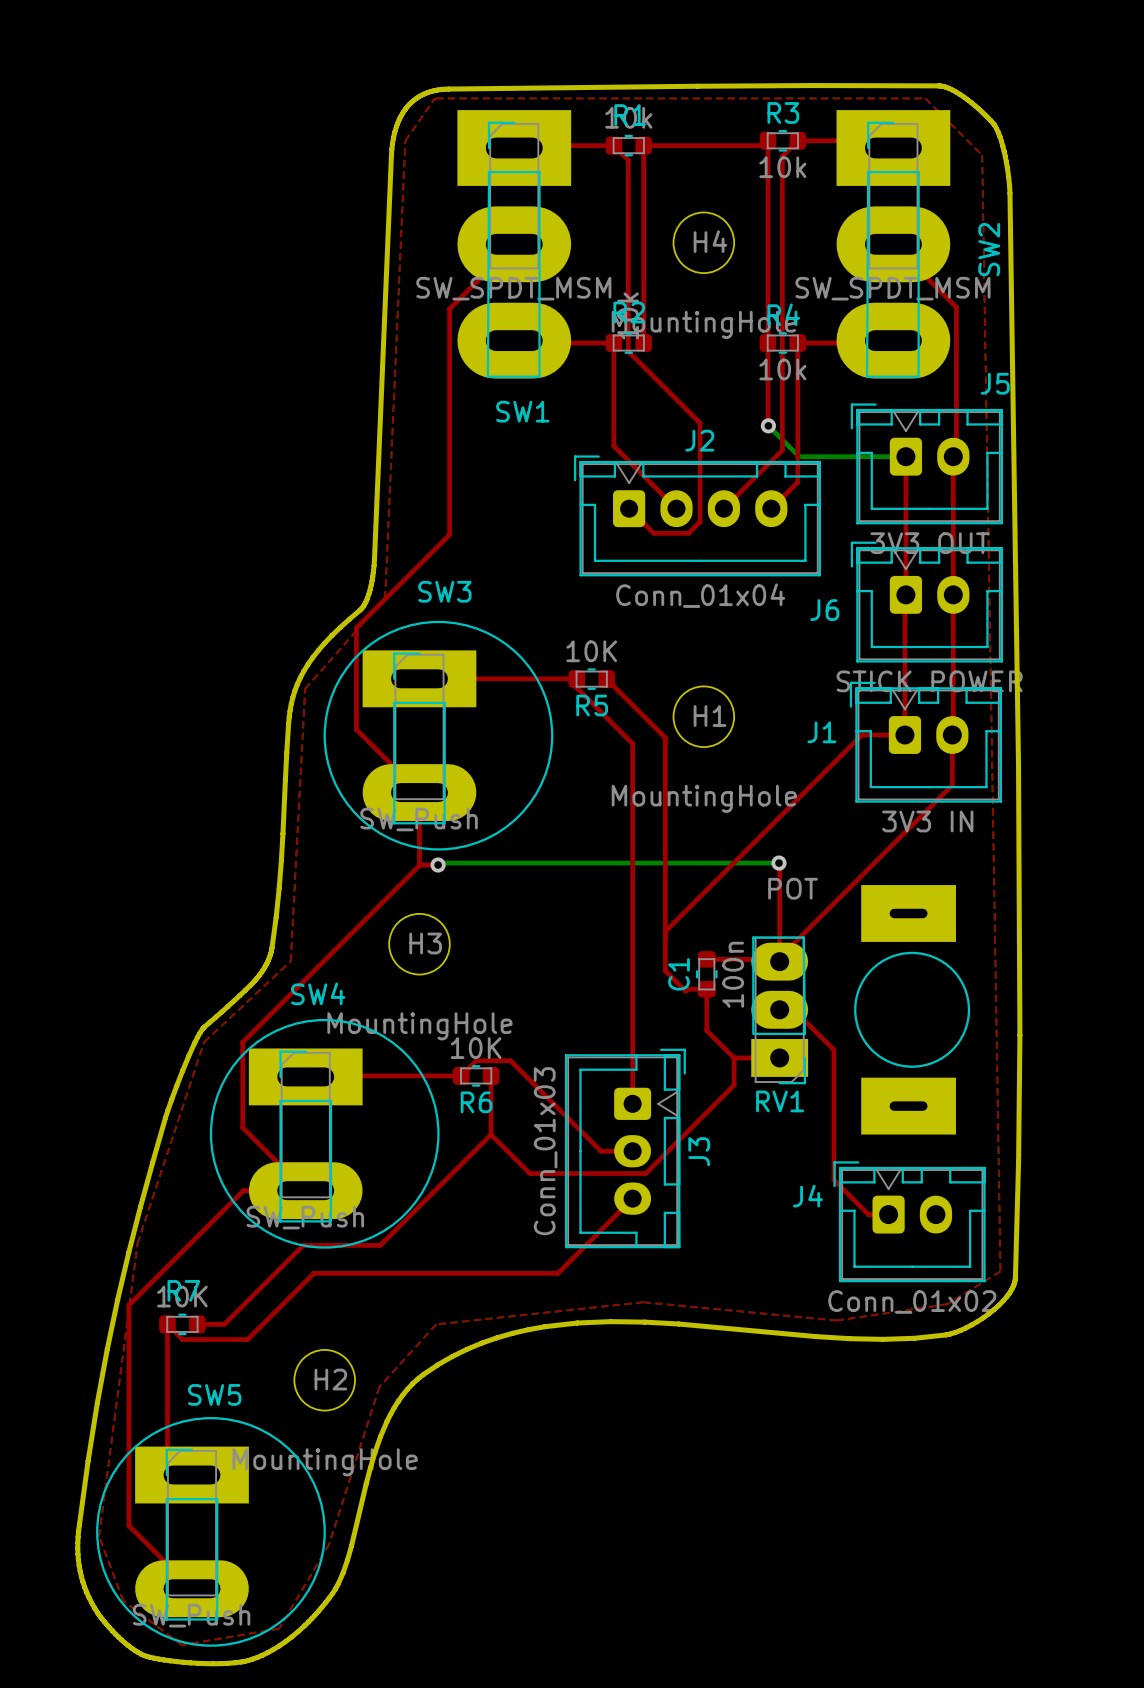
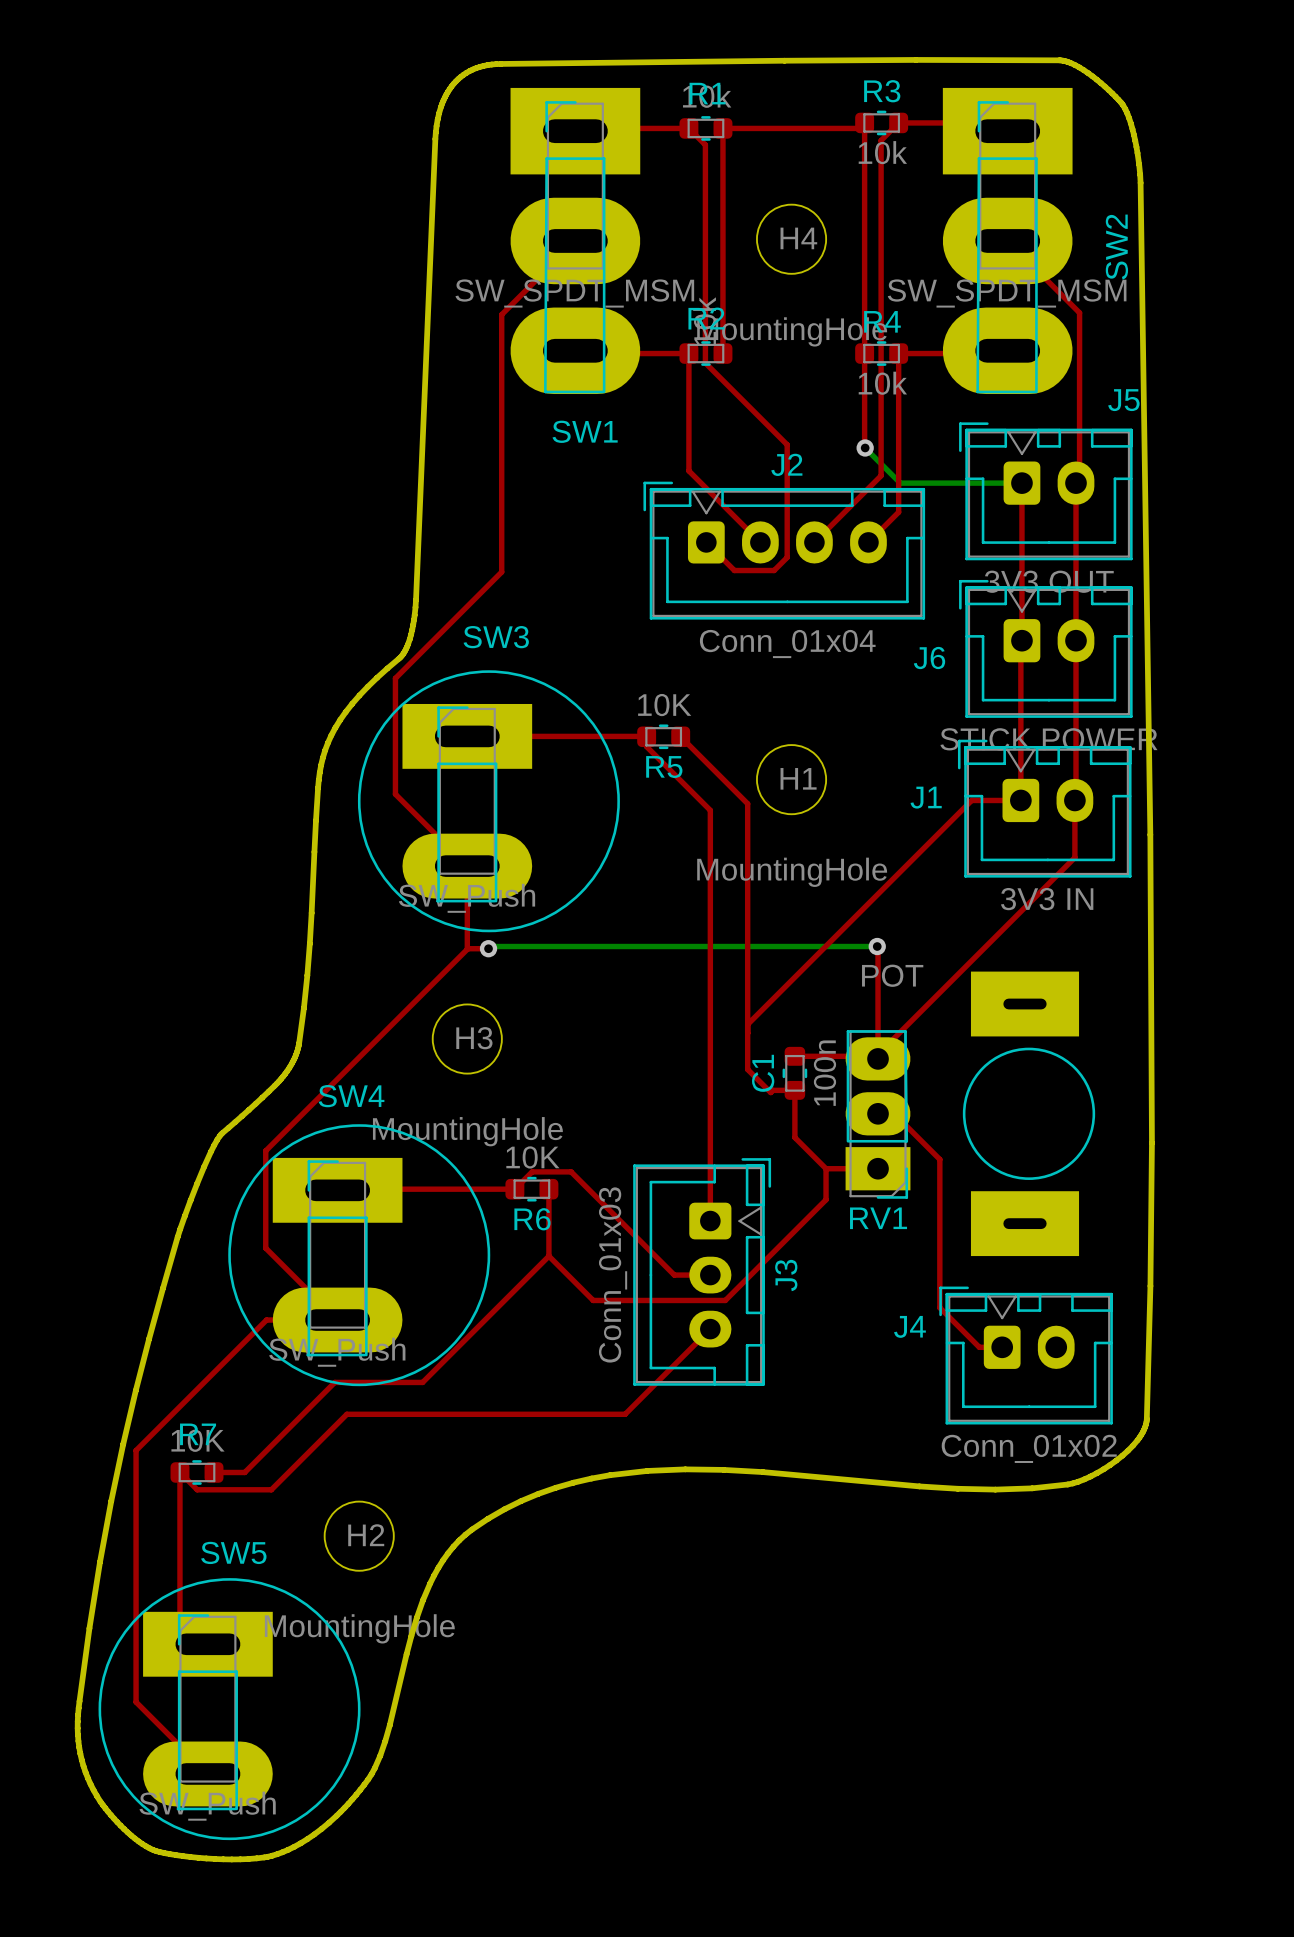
top zone outline: (436, 98) (925, 98) (982, 155) (1000, 1271) (947, 1304) (836, 1320) (643, 1302) (436, 1324) (379, 1386) (329, 1543) (279, 1628) (181, 1645) (123, 1600) (99, 1536) (137, 1243) (204, 1042) (290, 961) (305, 688) (385, 598) (405, 140) (436, 98) -> none

